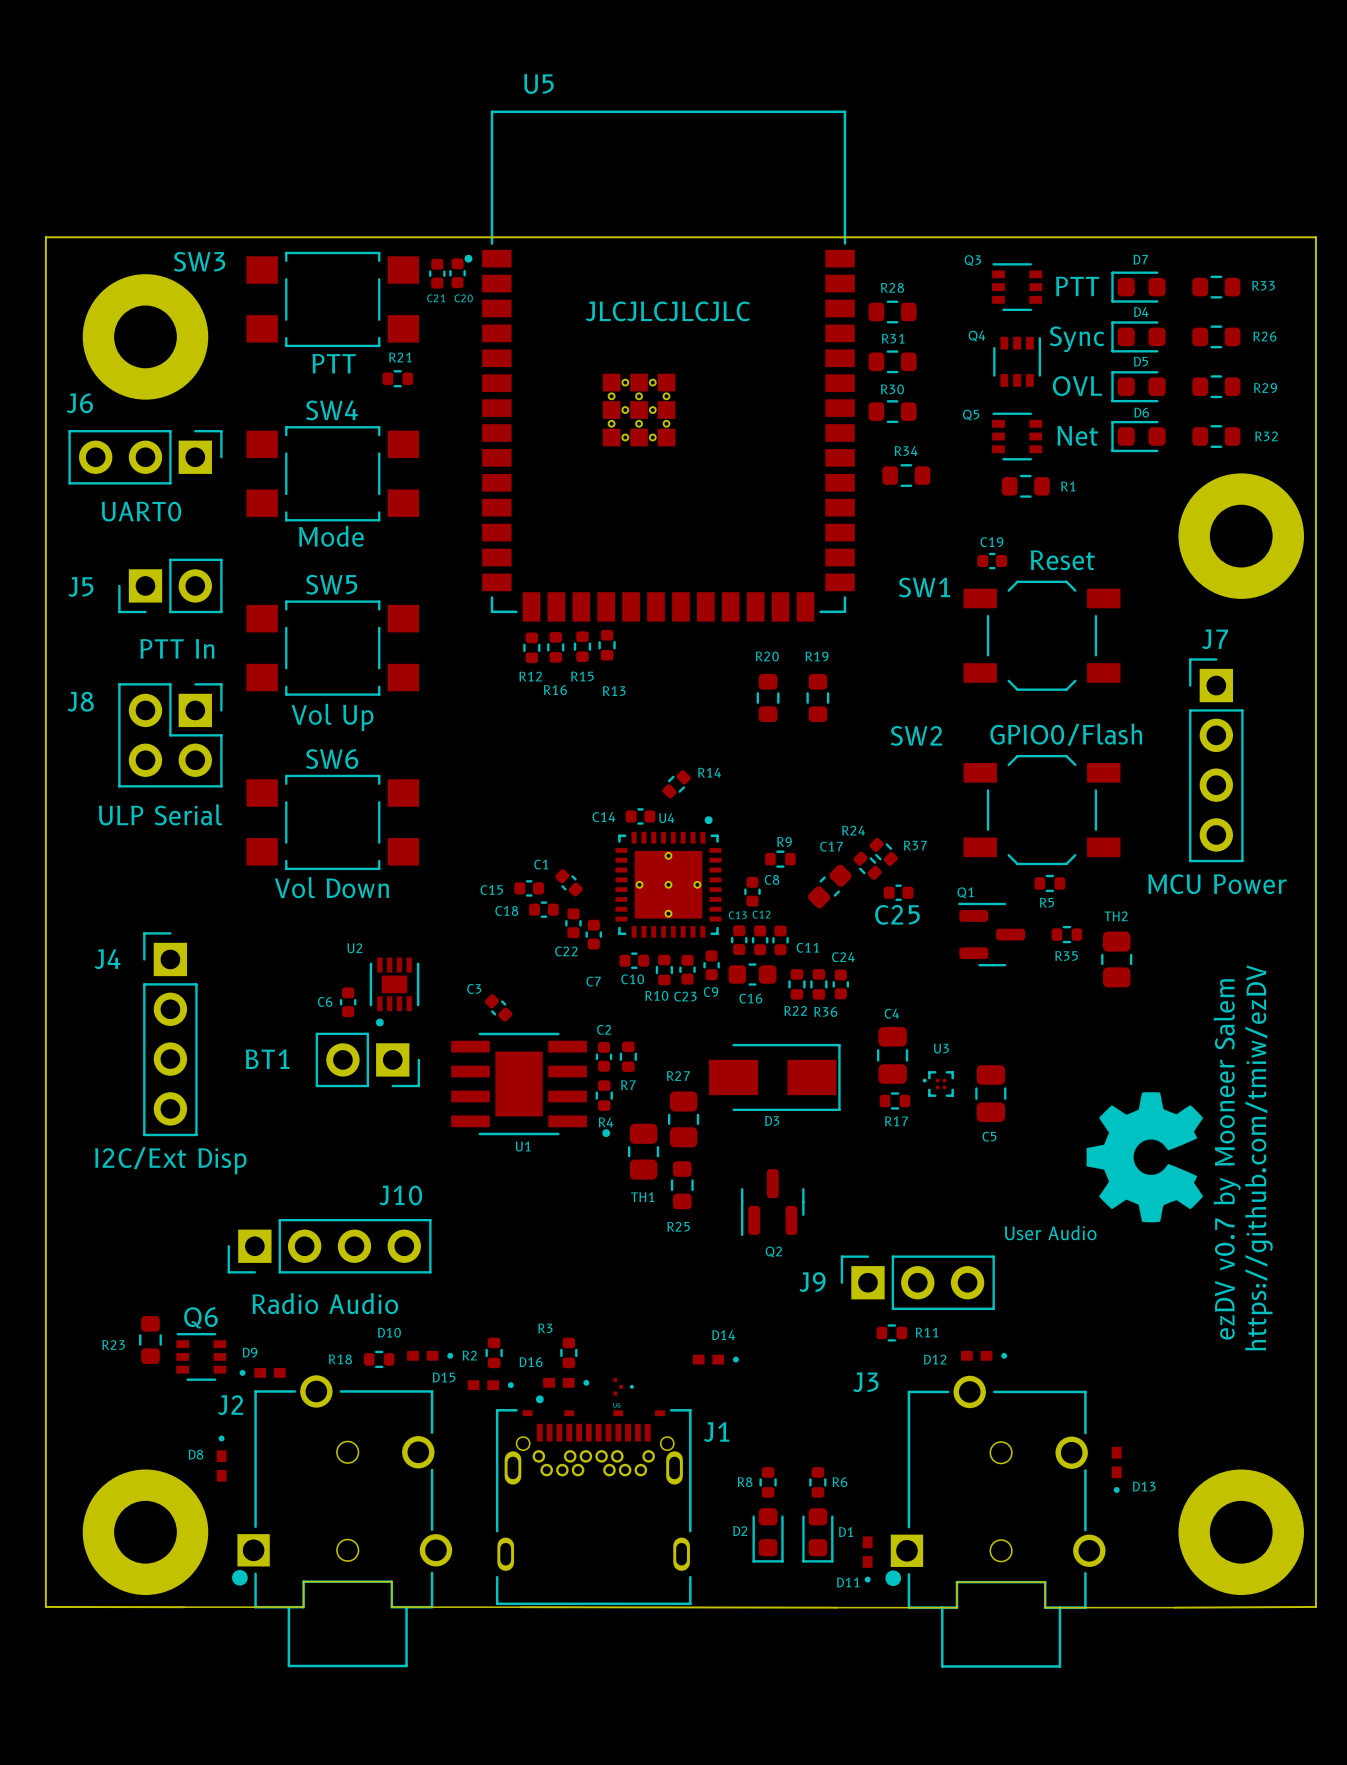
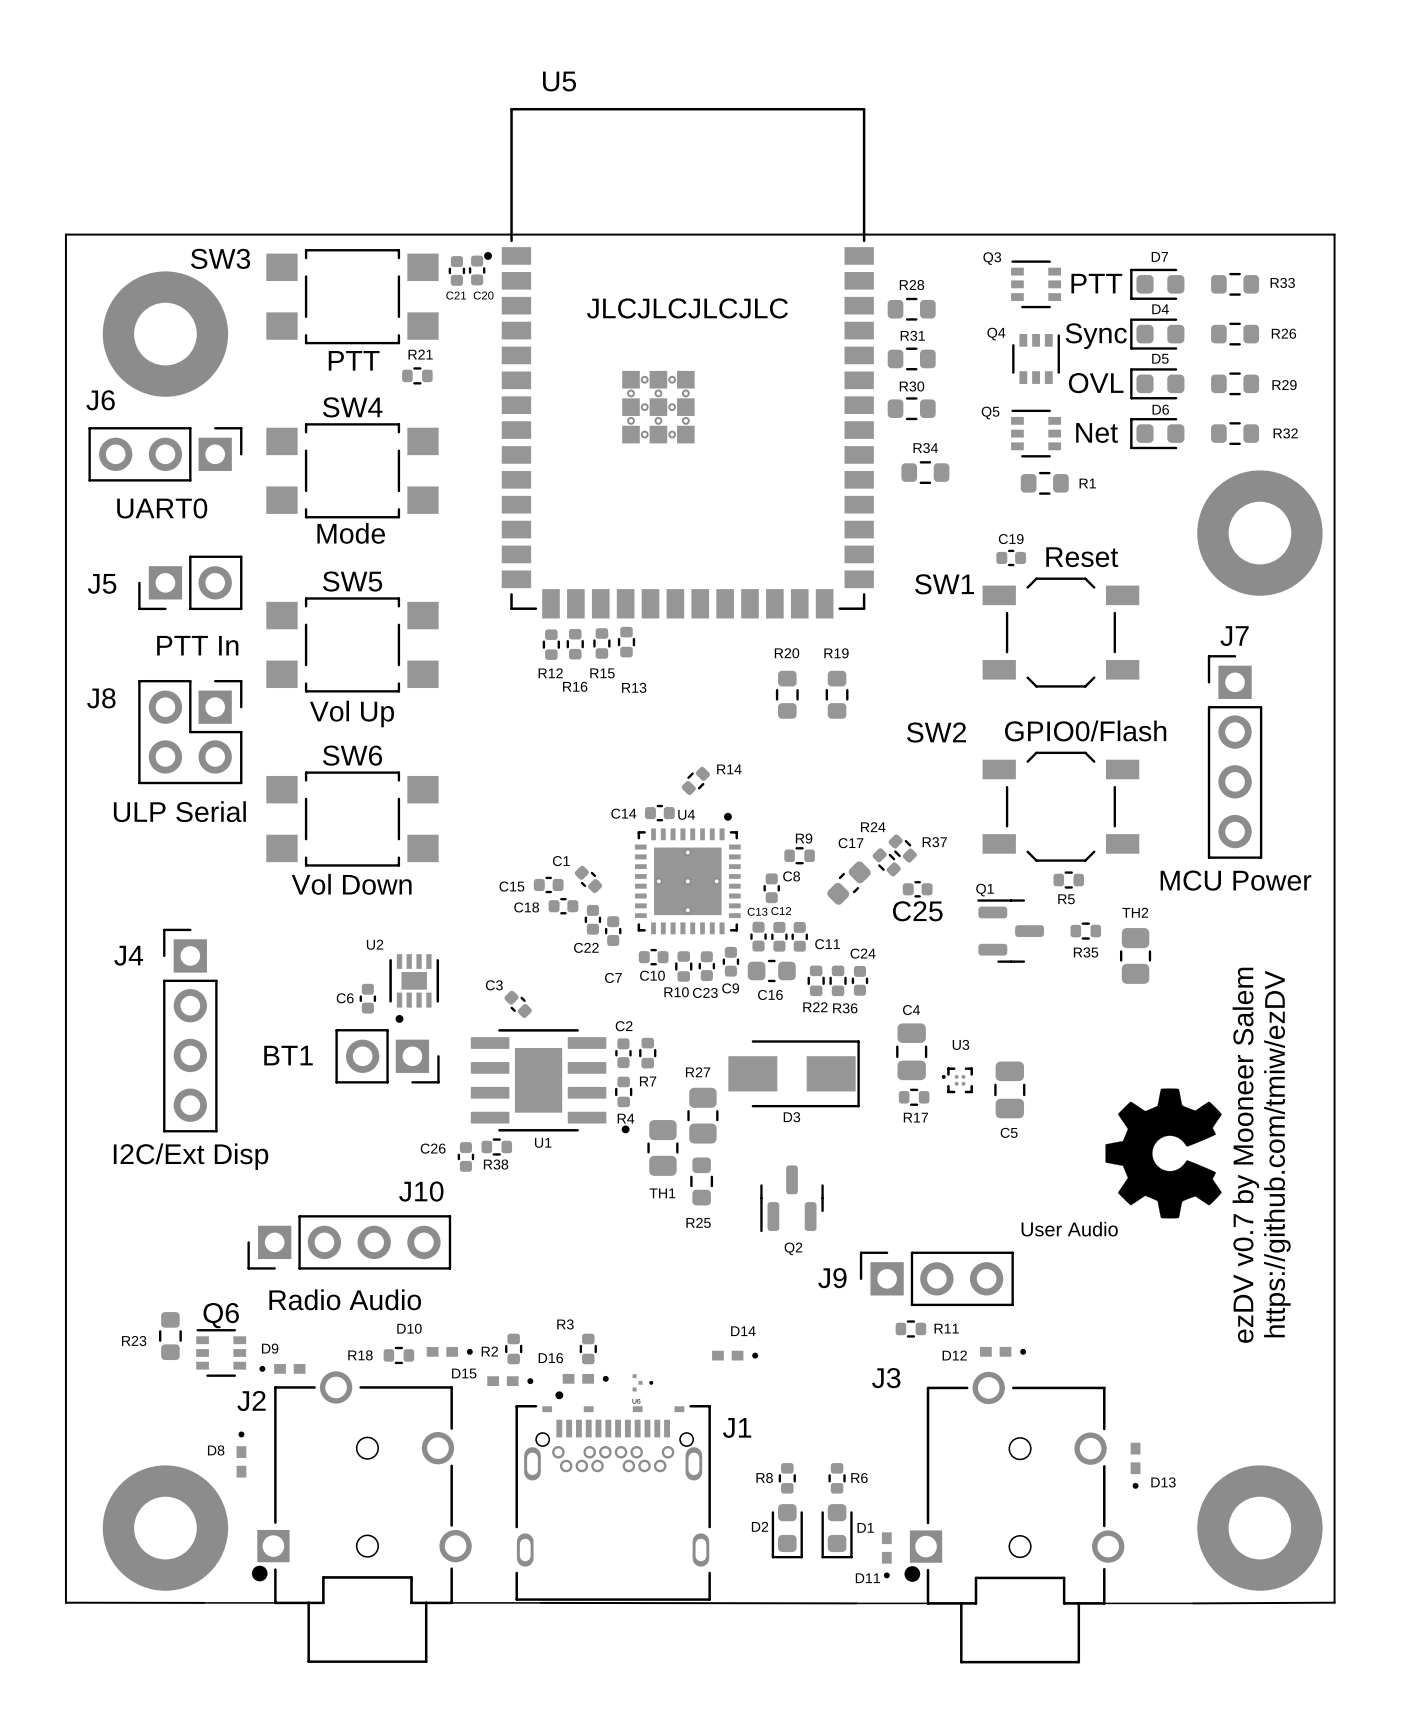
R38: none -> (496, 1146)
C26: none -> (465, 1156)

